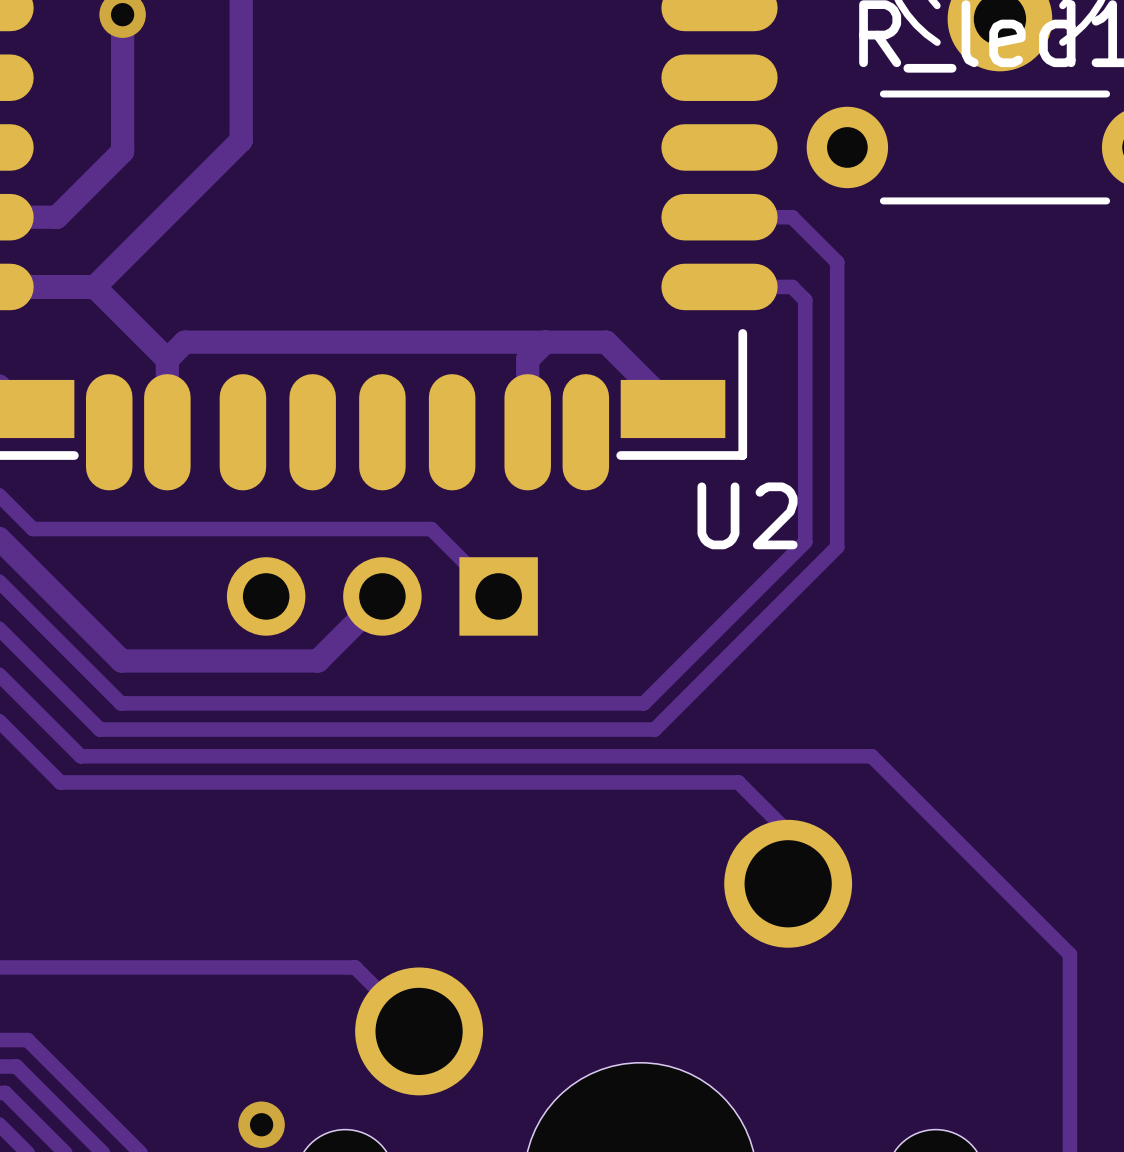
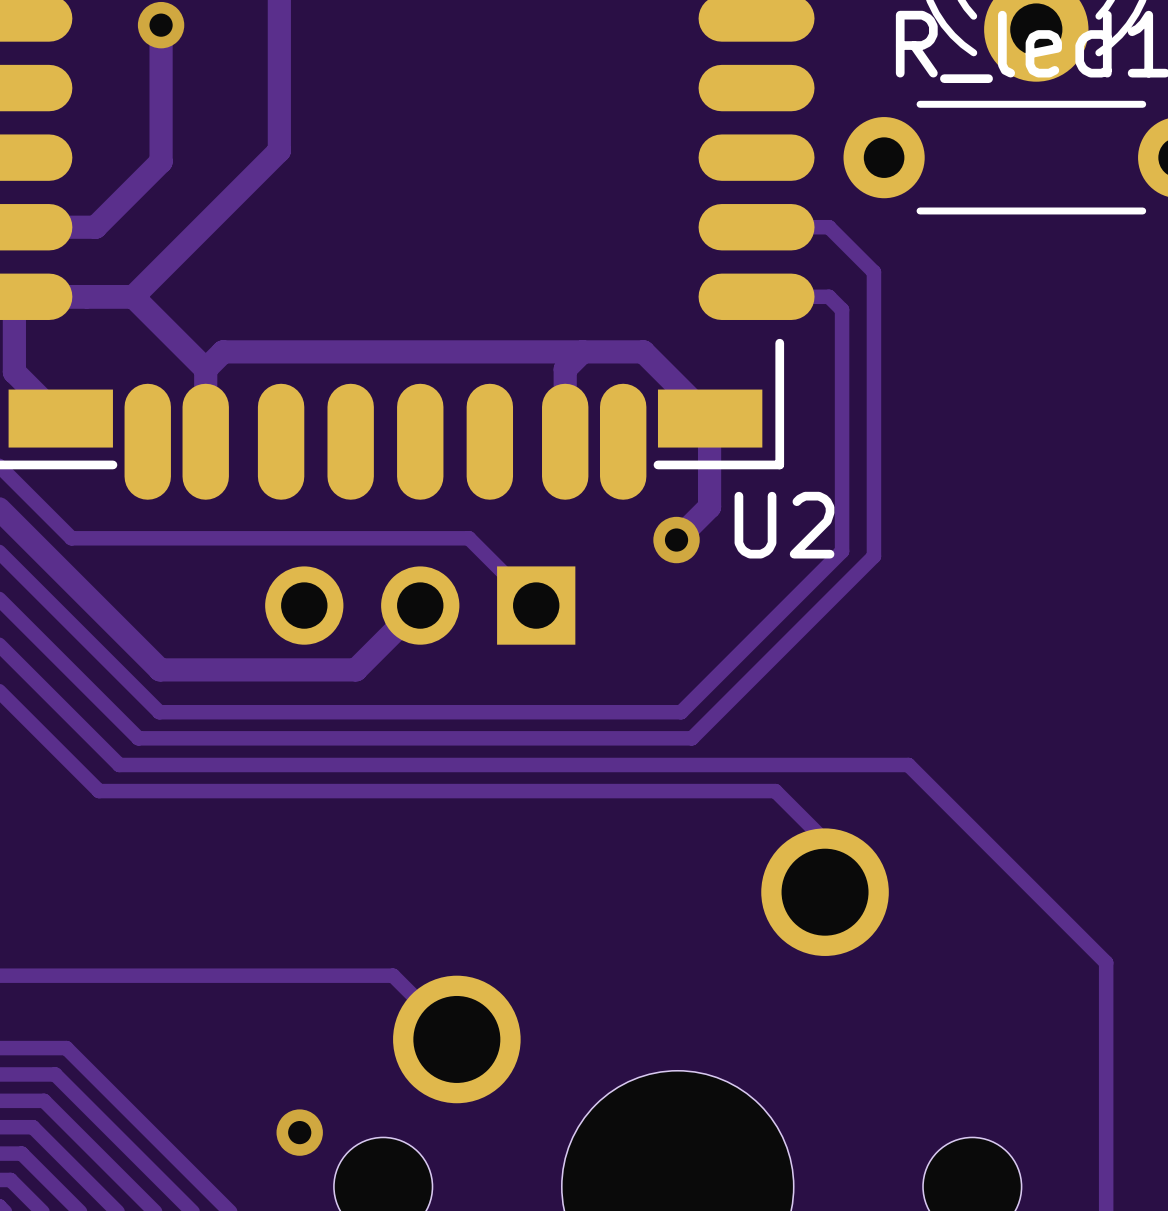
track: none -> (709, 419) (709, 506) (676, 540)
via: none -> (676, 540)

